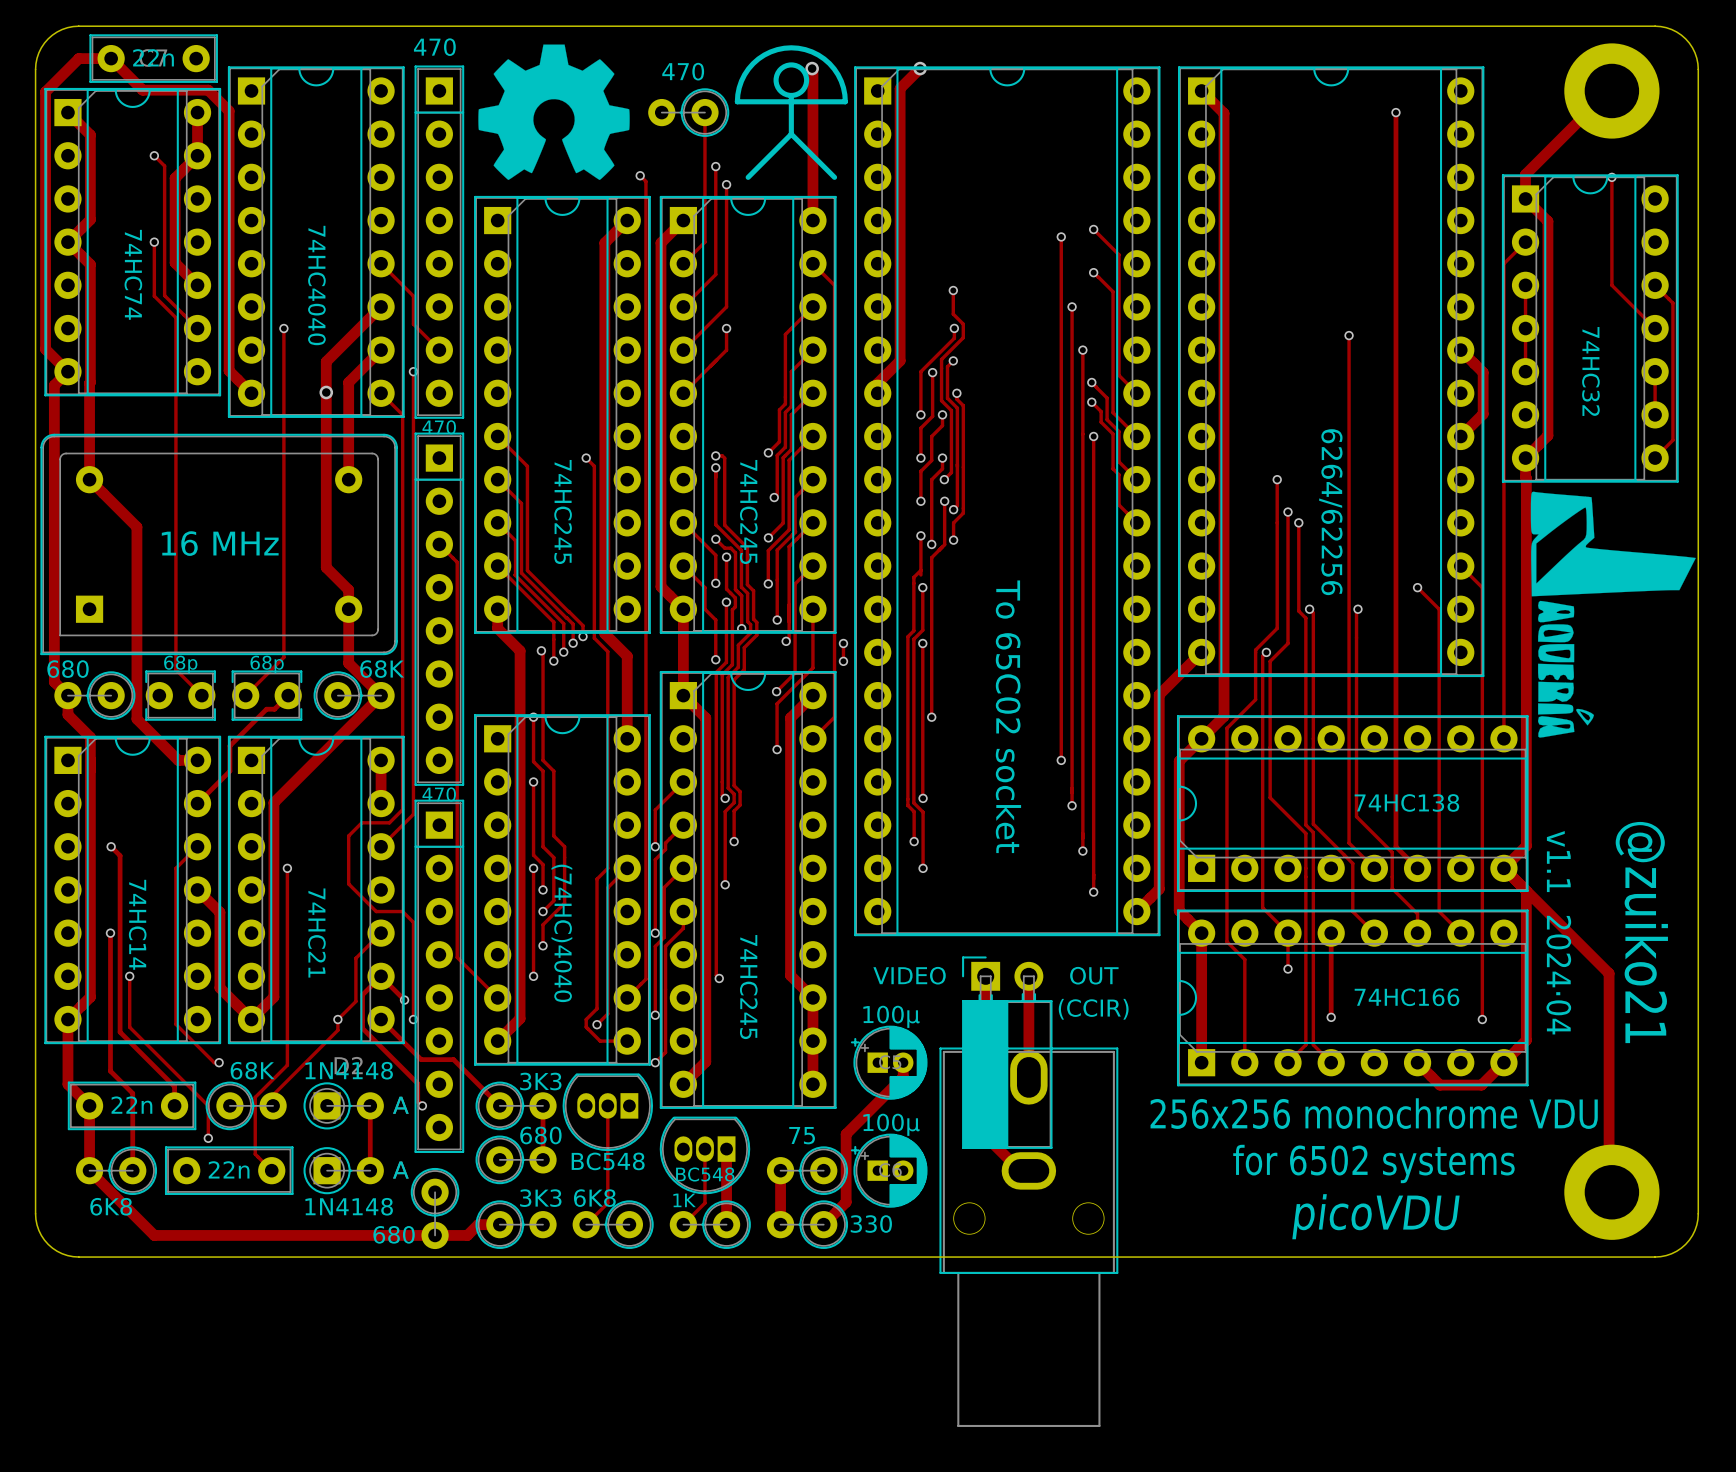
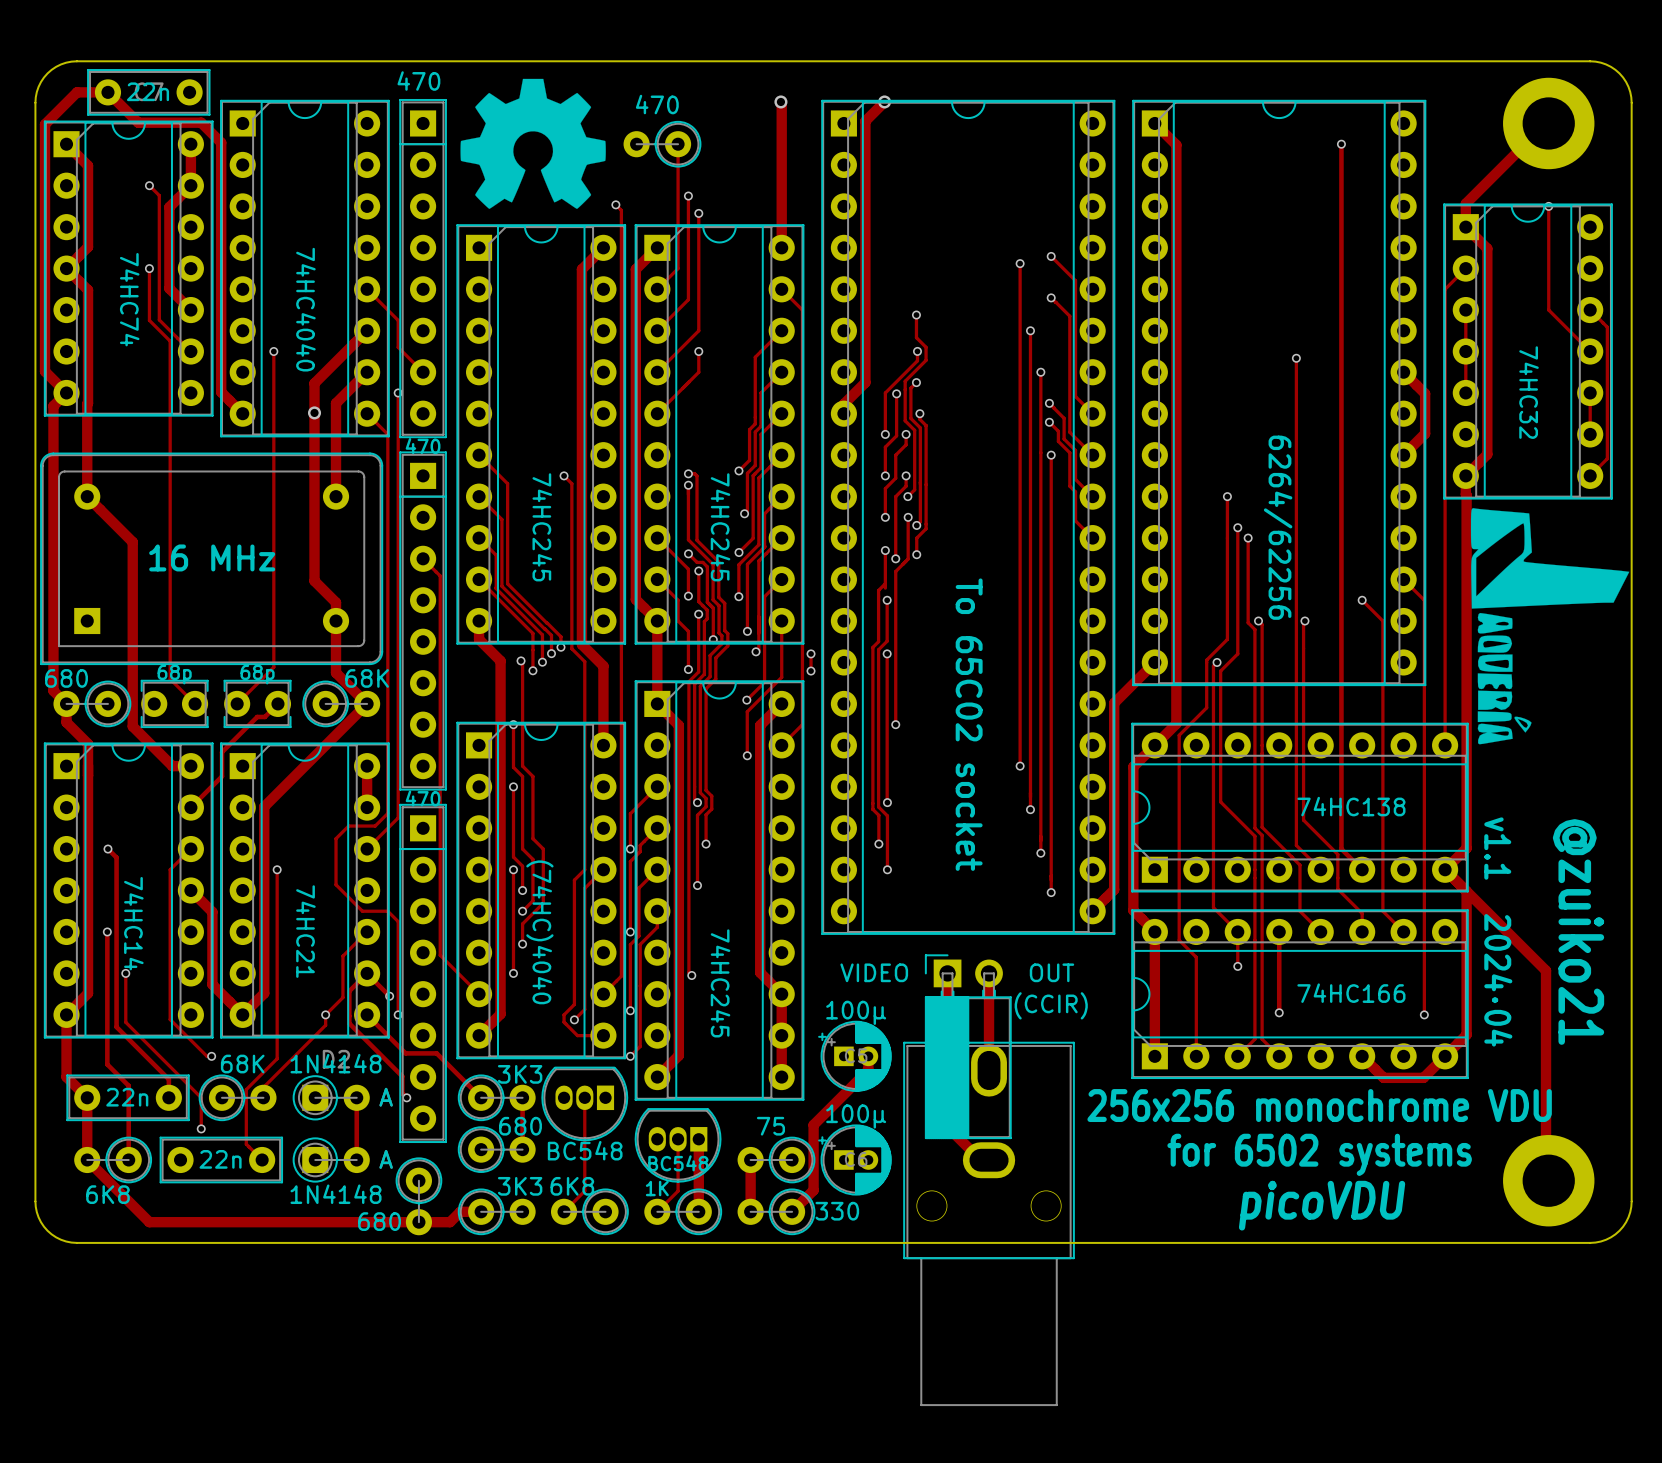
drawing: [773, 62, 810, 99] -> none
line: (791, 95) (791, 134) -> none
line: (737, 101) (845, 101) (841, 81) (829, 63) (812, 51) (791, 47) (770, 51) (753, 63) (741, 81) (737, 101) -> none
line: (791, 134) (834, 177) -> none
line: (791, 134) (748, 177) -> none

